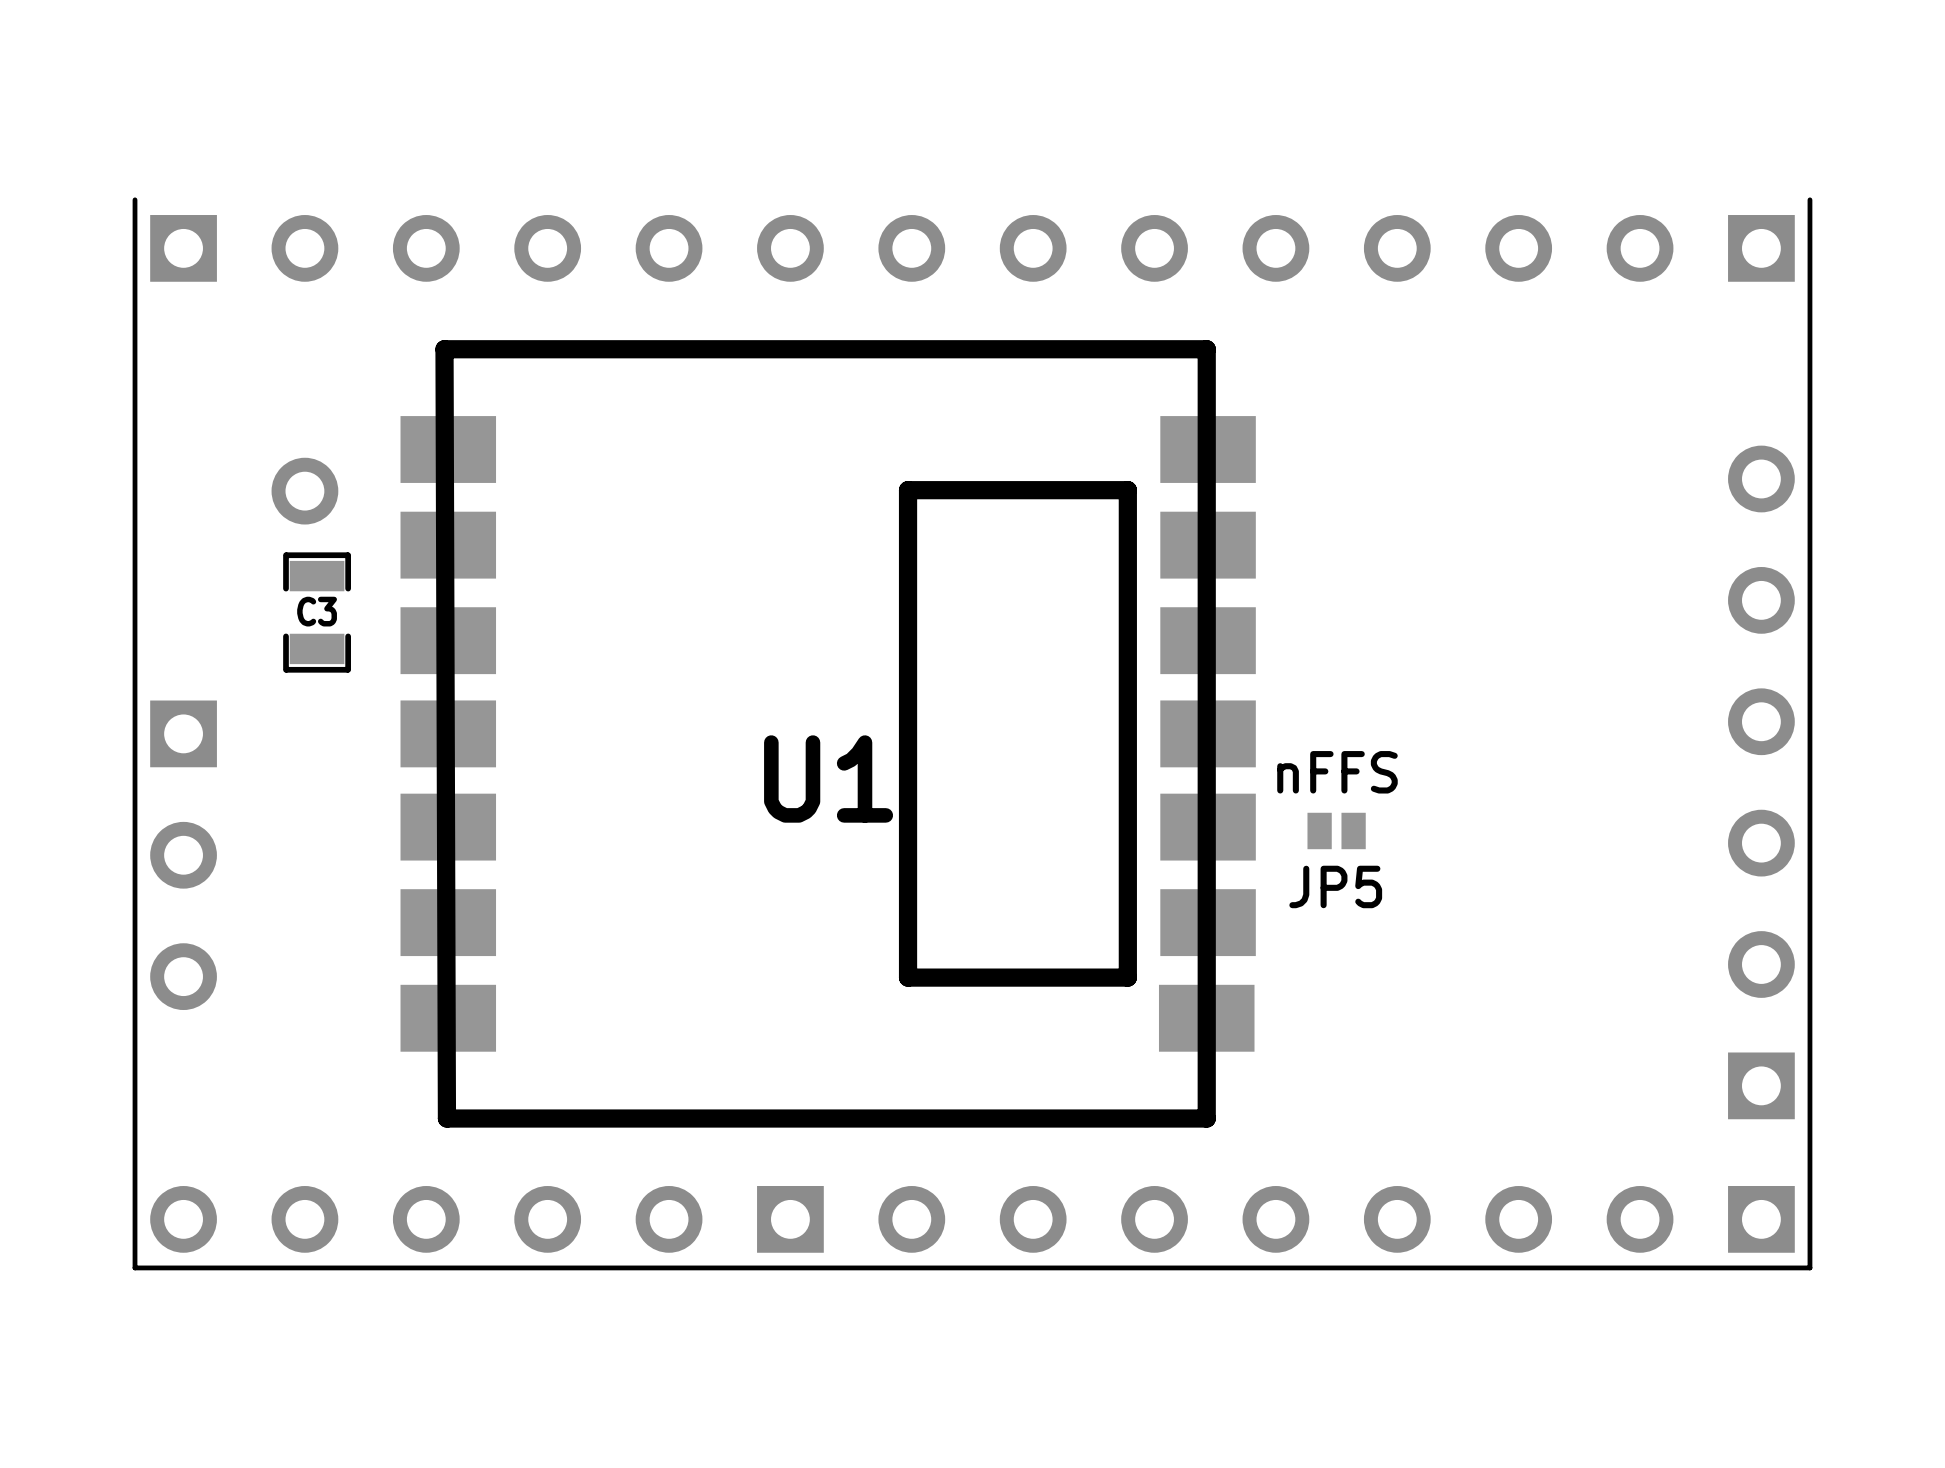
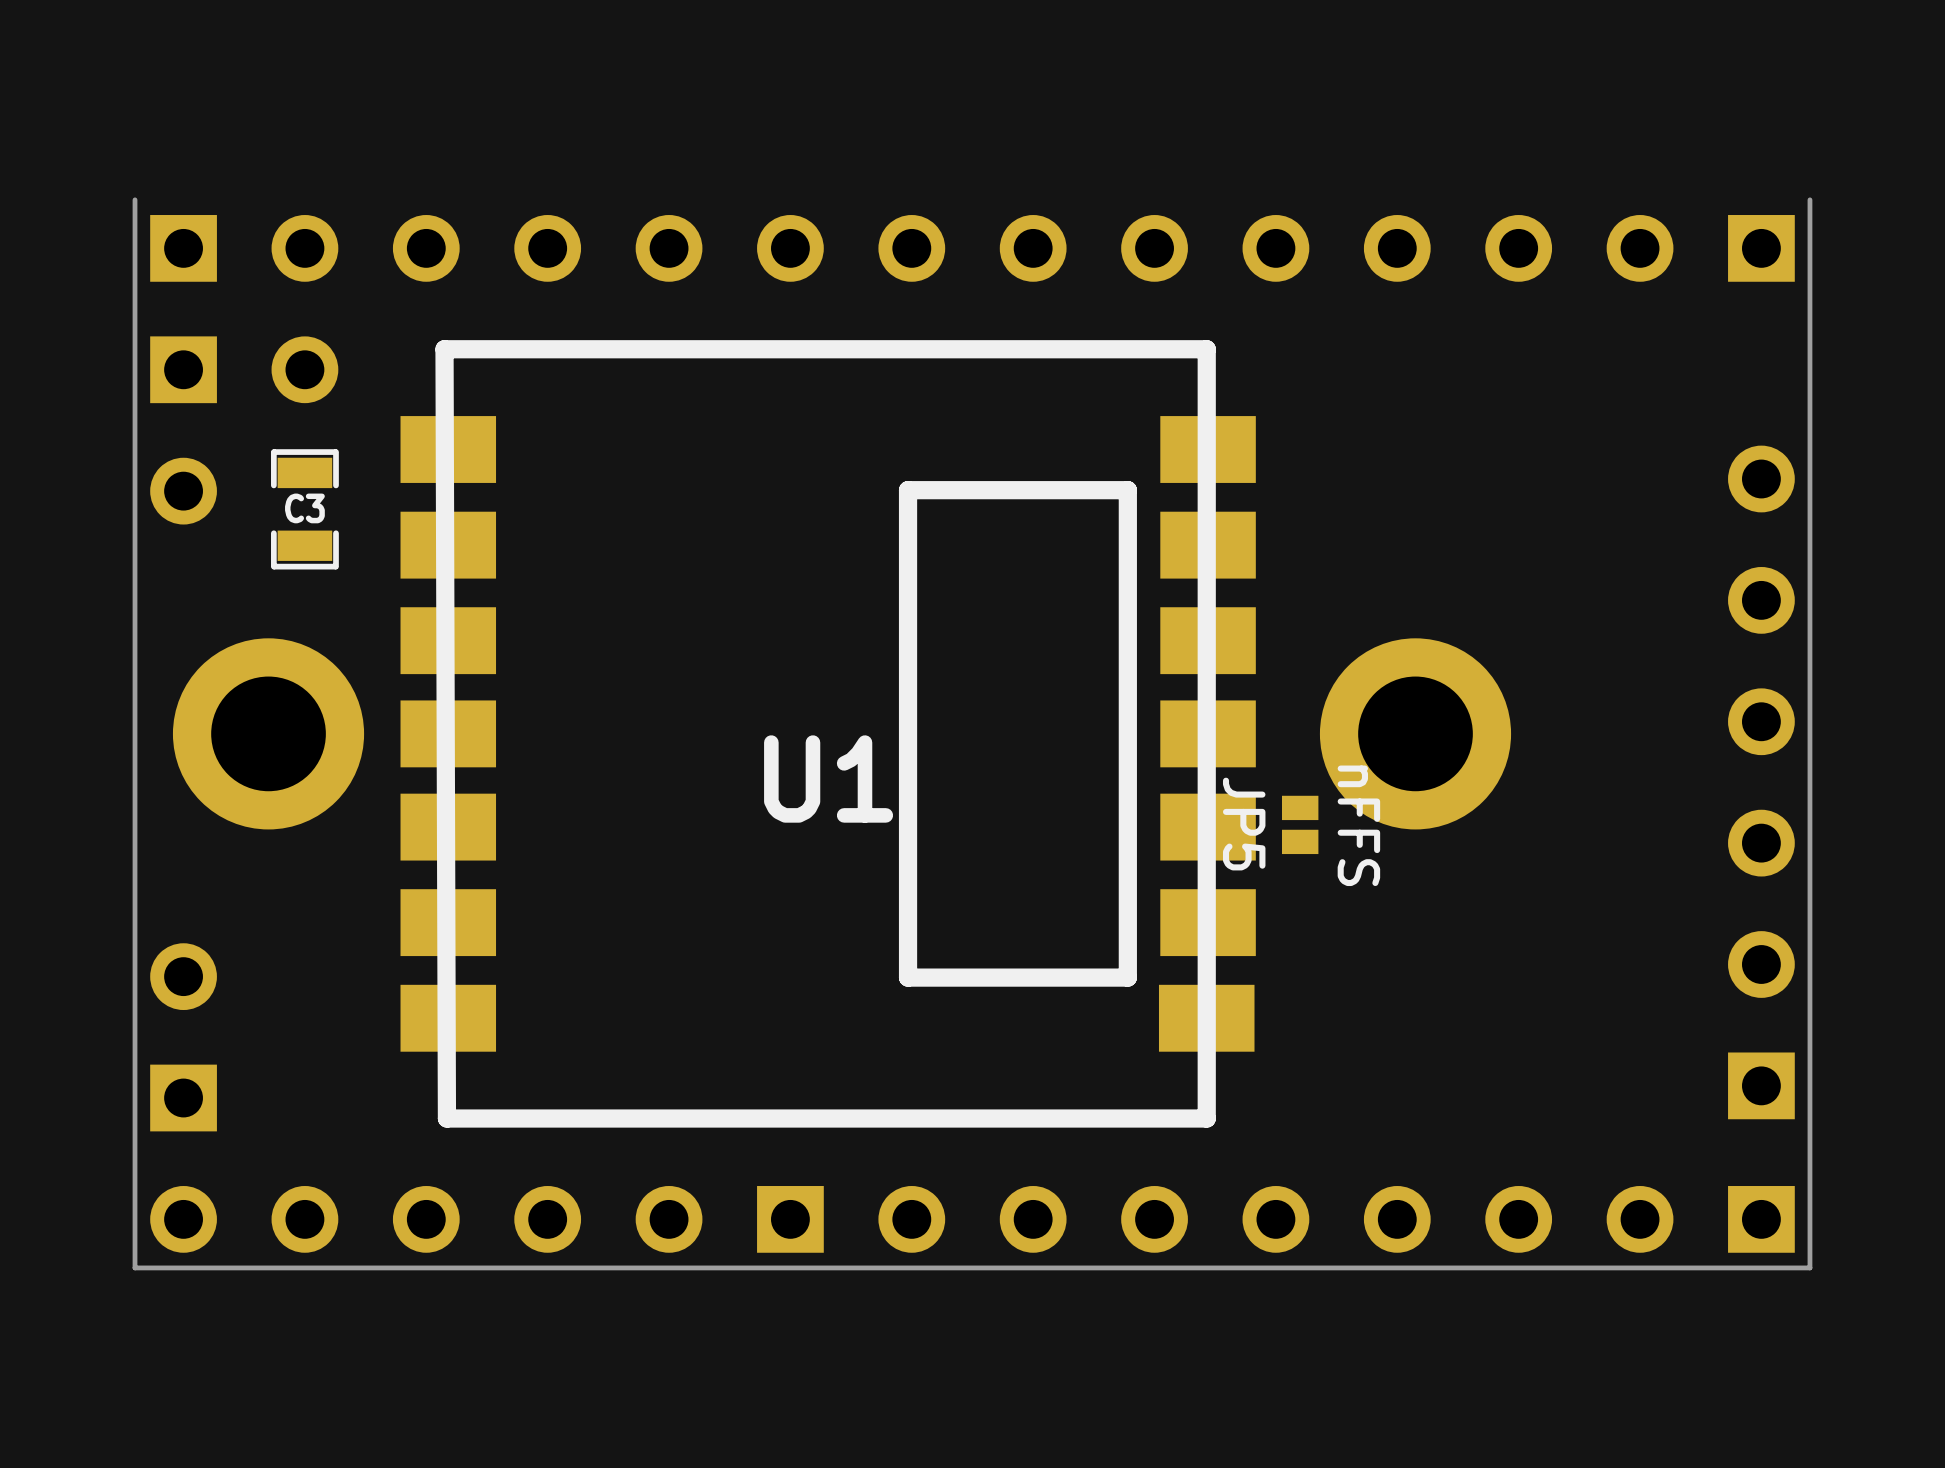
part: none -> (183, 430)
part position: (304, 491) -> (304, 369)
C3 position: (317, 612) -> (304, 509)
part: none -> (268, 733)
part: none -> (1415, 733)
JP5 rotation: 0° (1336, 830) -> 90° clockwise (1300, 824)
JP5 position: (1336, 830) -> (1300, 824)
part: (183, 855) -> none
part: none -> (183, 1037)

